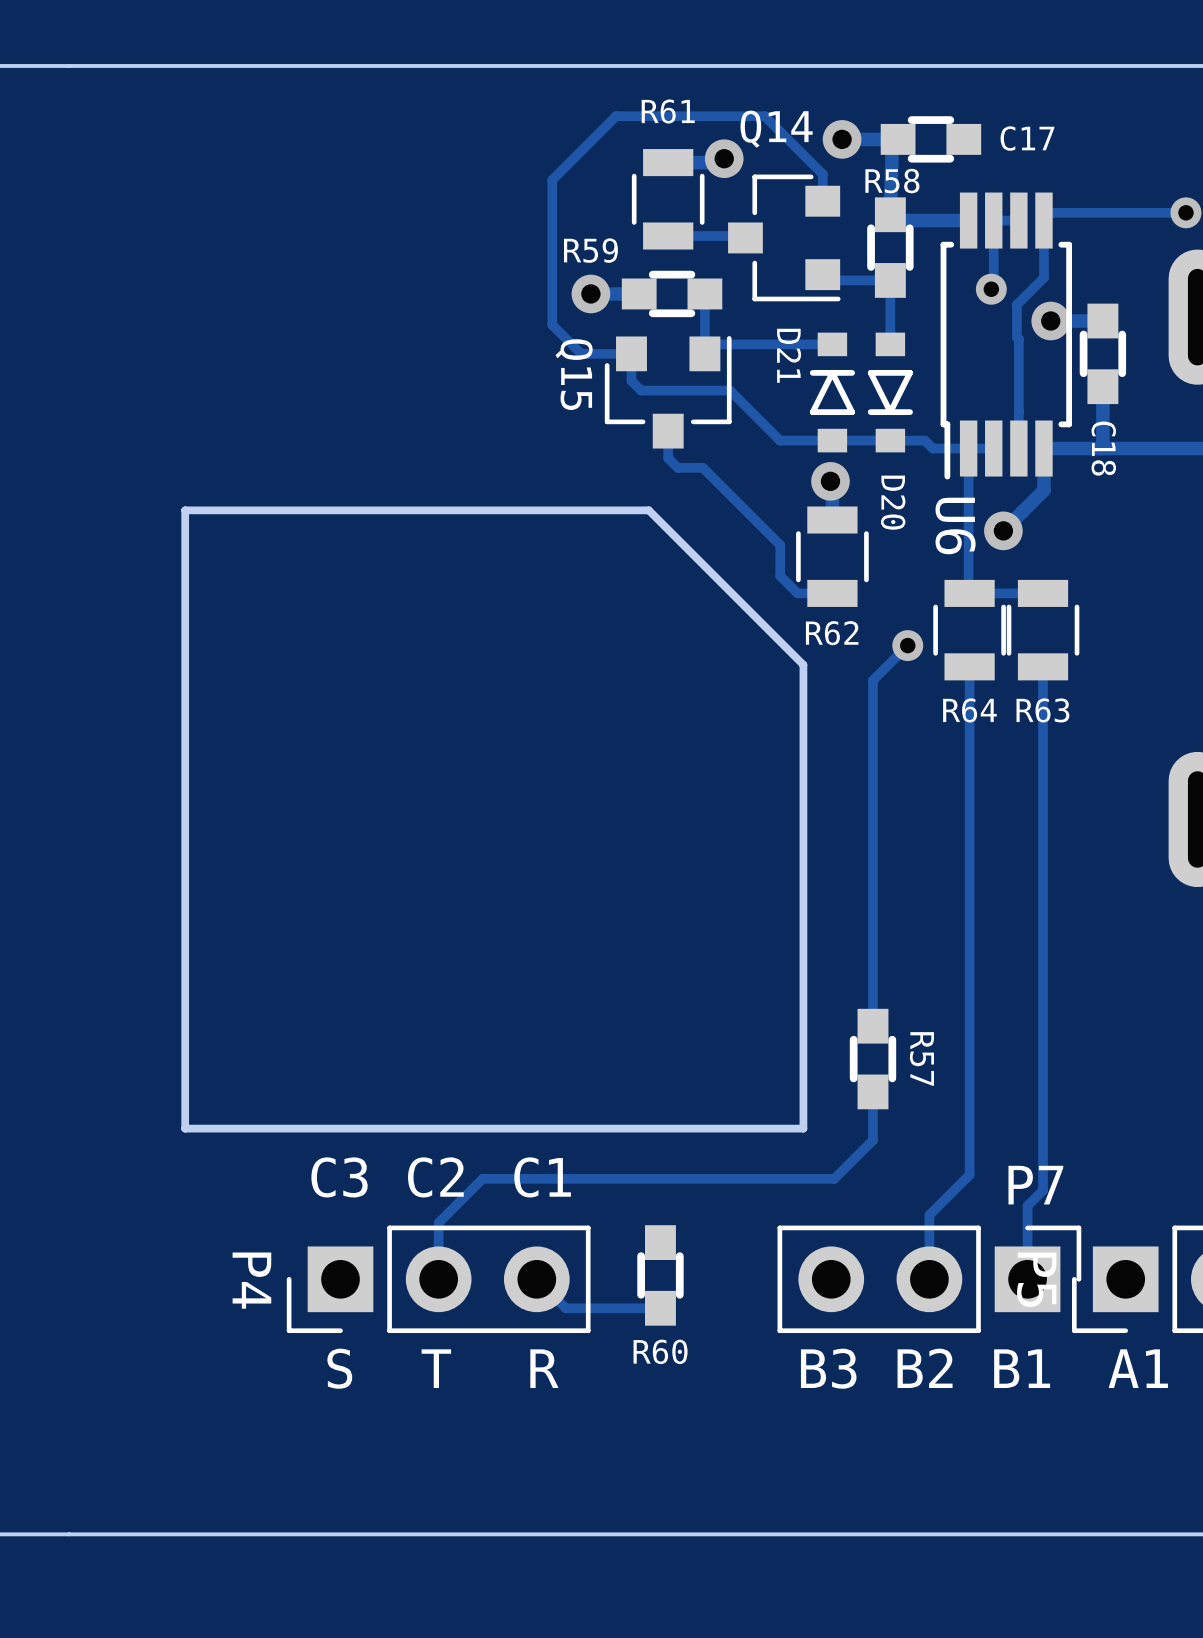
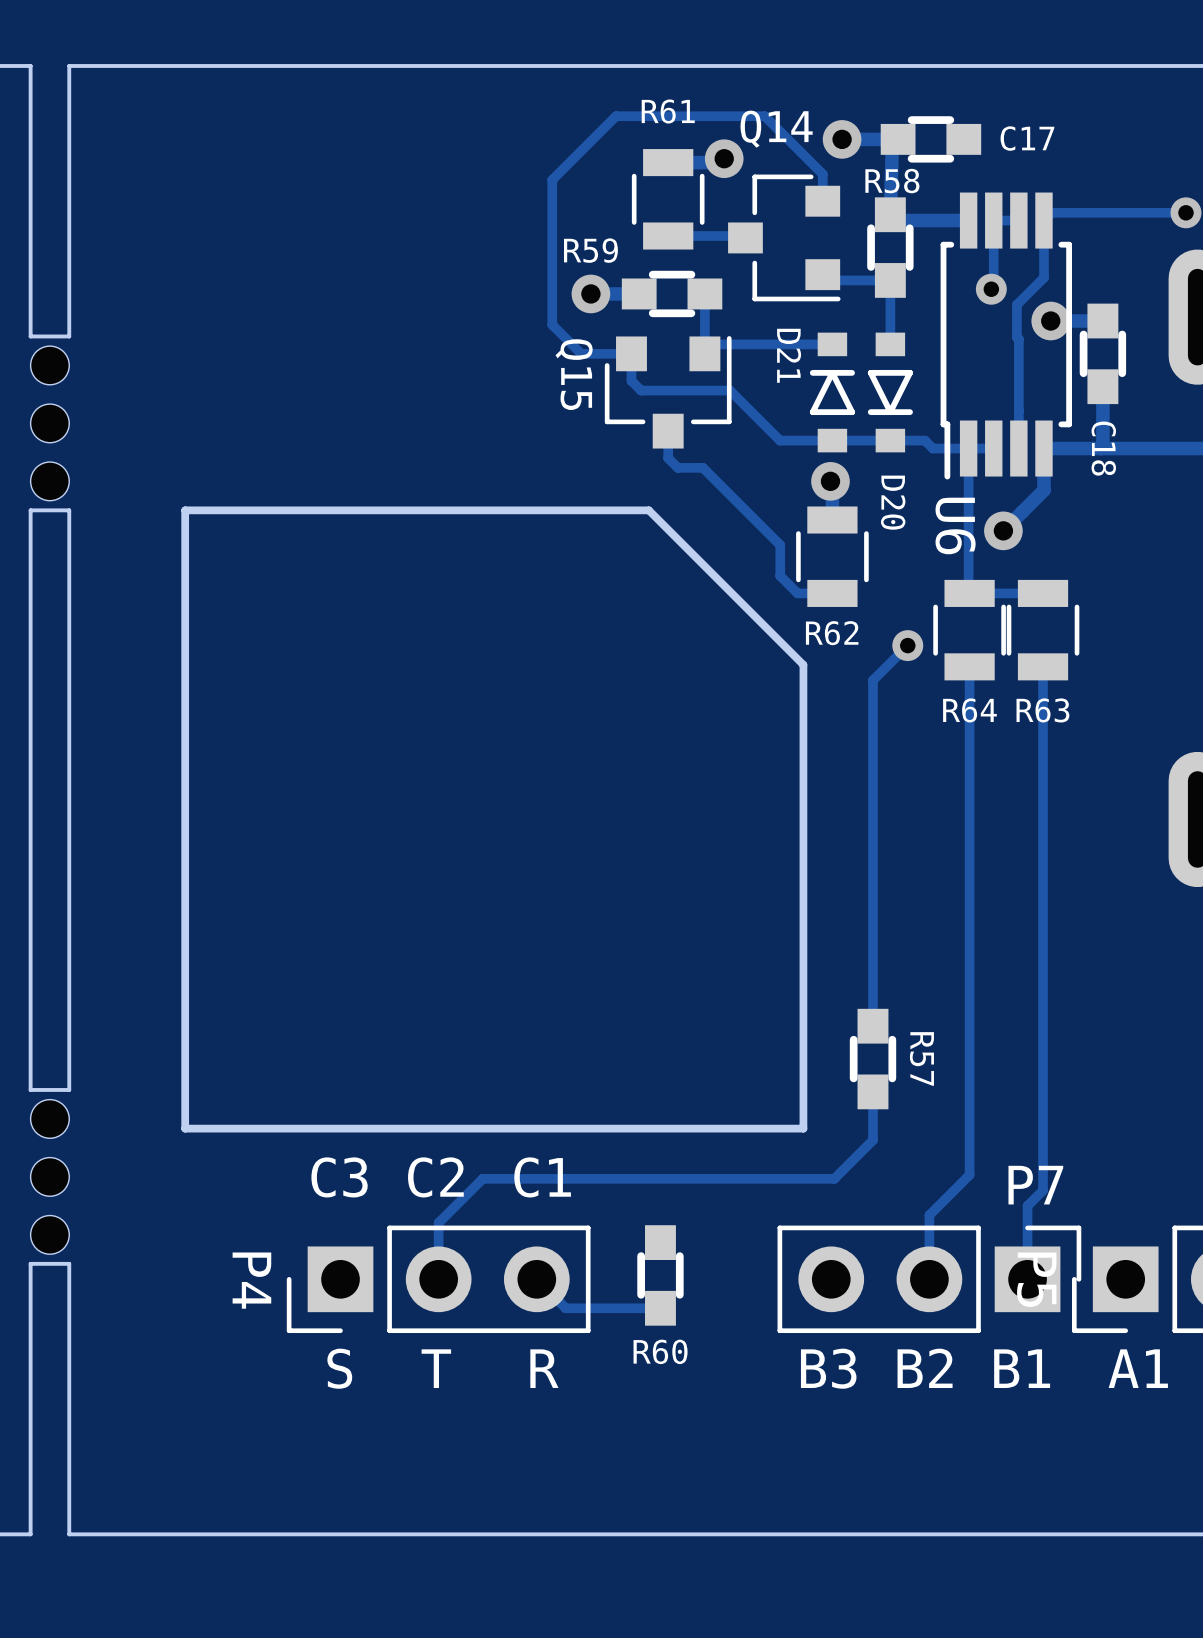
board edge: (69, 65) (30, 65) -> (69, 65) (69, 336) (30, 336) (30, 65)
part: none -> (49, 365)
part: none -> (49, 423)
part: none -> (49, 481)
board edge: none -> (69, 510) (69, 1089) (30, 1089) (30, 510) (69, 510)
part: none -> (49, 1118)
part: none -> (49, 1176)
part: none -> (49, 1234)
board edge: (69, 1534) (30, 1534) -> (69, 1534) (69, 1263) (30, 1263) (30, 1534)

